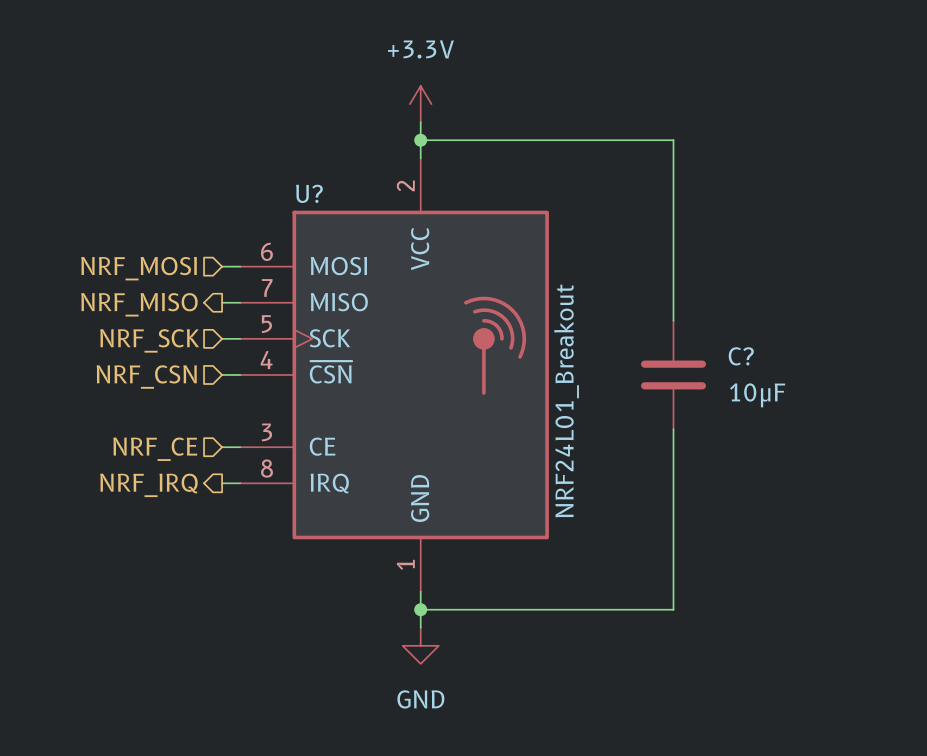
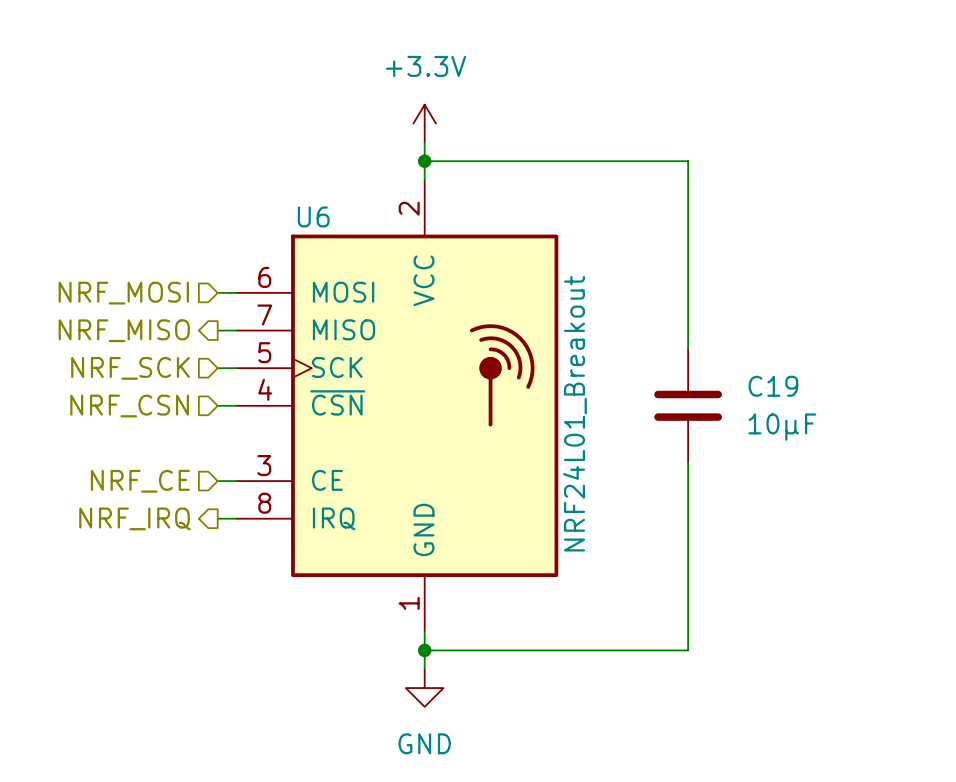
U? name: U? (309, 193) -> U6 (313, 216)
C? name: C? (741, 356) -> C19 (773, 386)

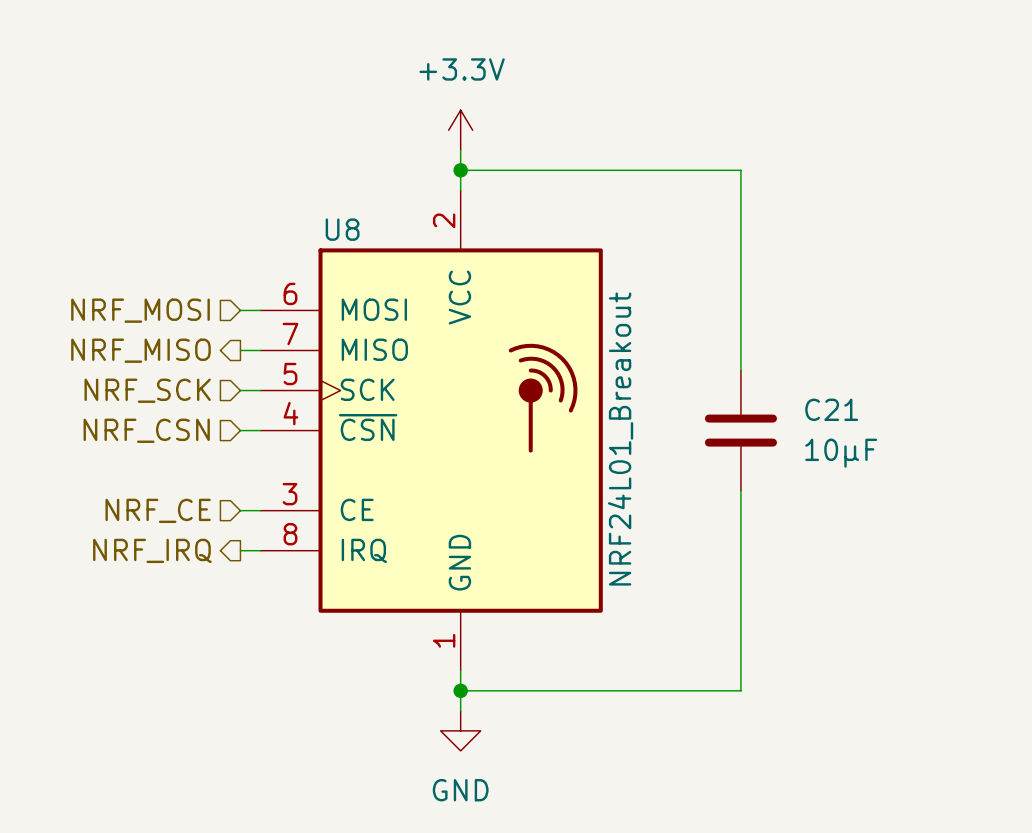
U6 name: U6 (313, 216) -> U8 (342, 229)
C19 name: C19 (773, 386) -> C21 (831, 409)

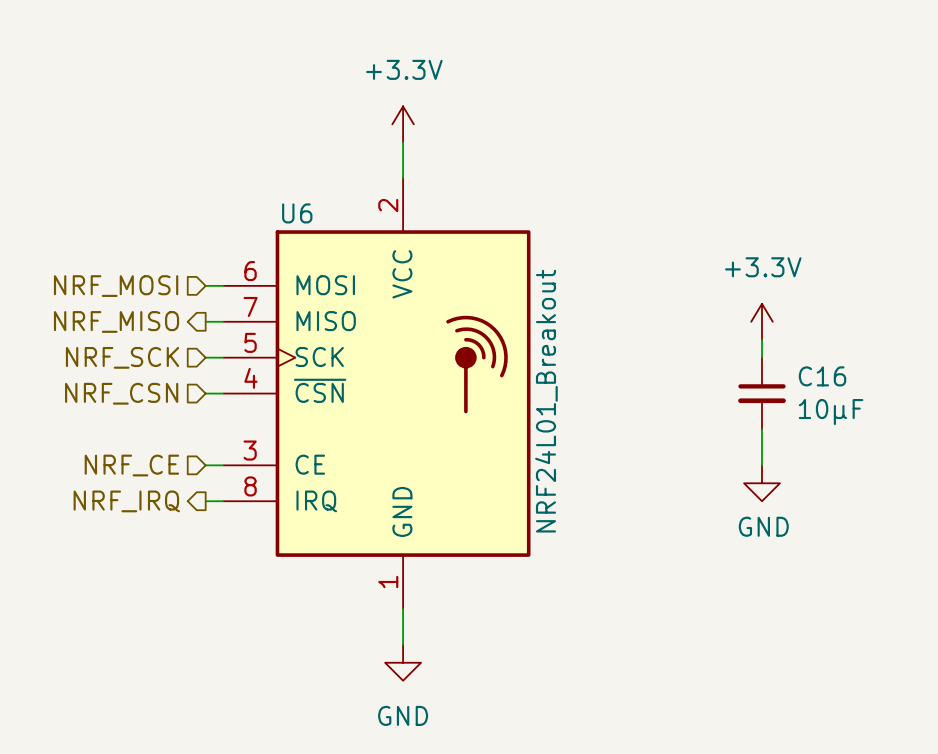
wire: (460, 170) (740, 170) (740, 370) -> none
junction: (460, 170) -> none
U8 name: U8 (342, 229) -> U6 (297, 213)
power symbol: none -> +3.3V (762, 321)
wire: none -> (762, 339) (762, 357)
C21: 10μF (740, 430) -> none
C16: none -> 10μF (762, 393)
wire: none -> (762, 429) (762, 465)
wire: (740, 490) (740, 690) (460, 690) -> none
power symbol: none -> GND (762, 483)
junction: (460, 690) -> none

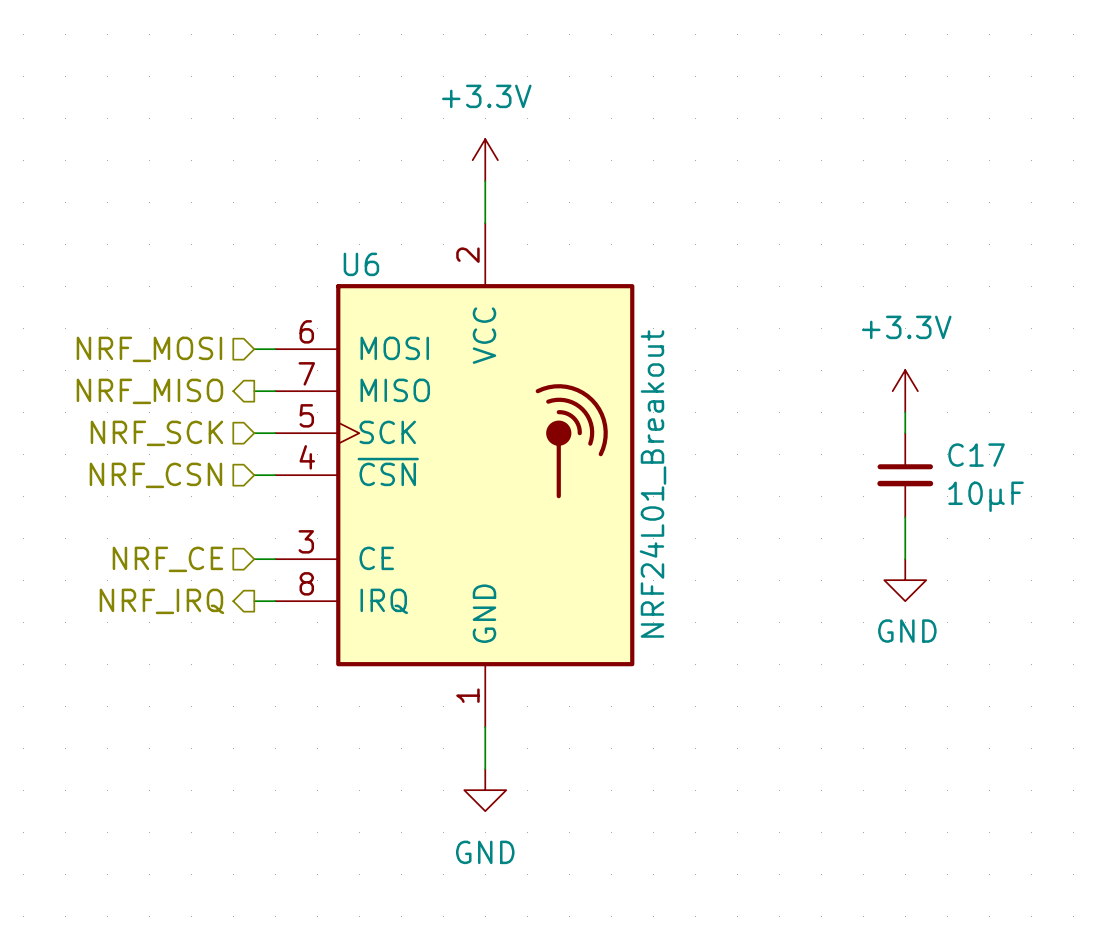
C16 name: C16 (822, 376) -> C17 (976, 455)

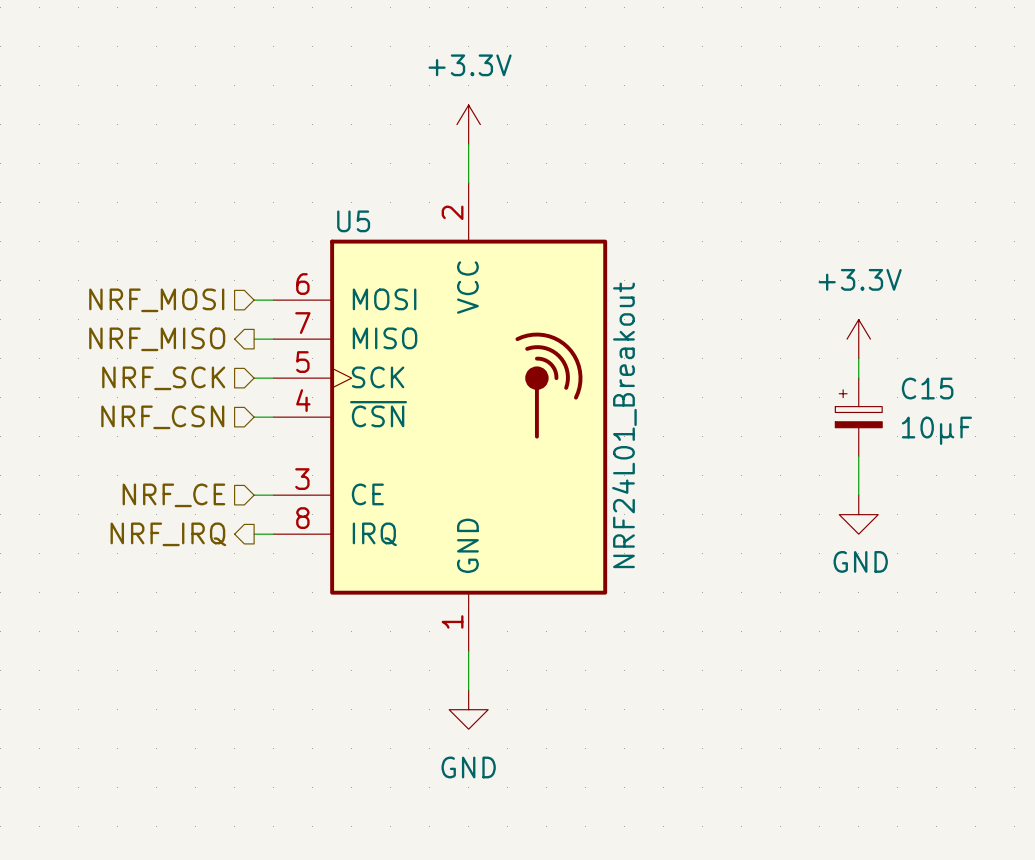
U6 name: U6 (361, 264) -> U5 (353, 221)
C17: 10μF (905, 475) -> none
C15: none -> 10μF (858, 417)

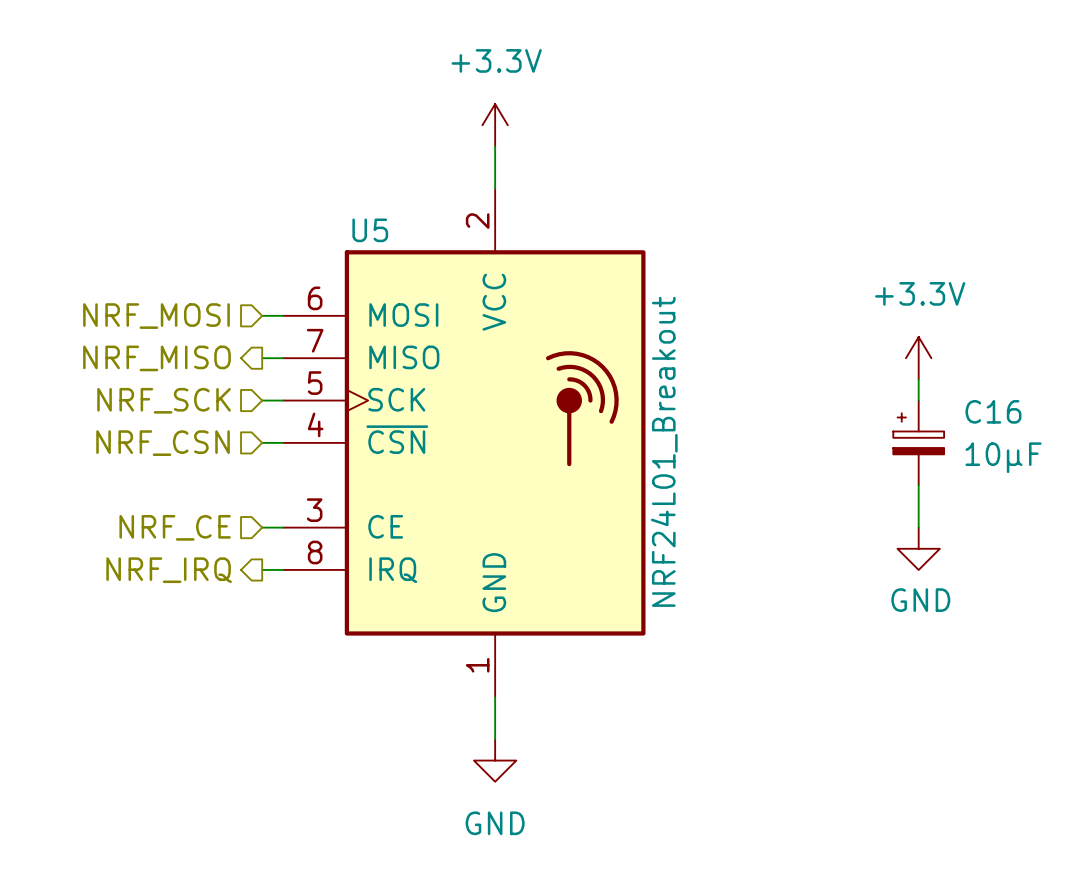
C15 name: C15 (927, 388) -> C16 (993, 411)

